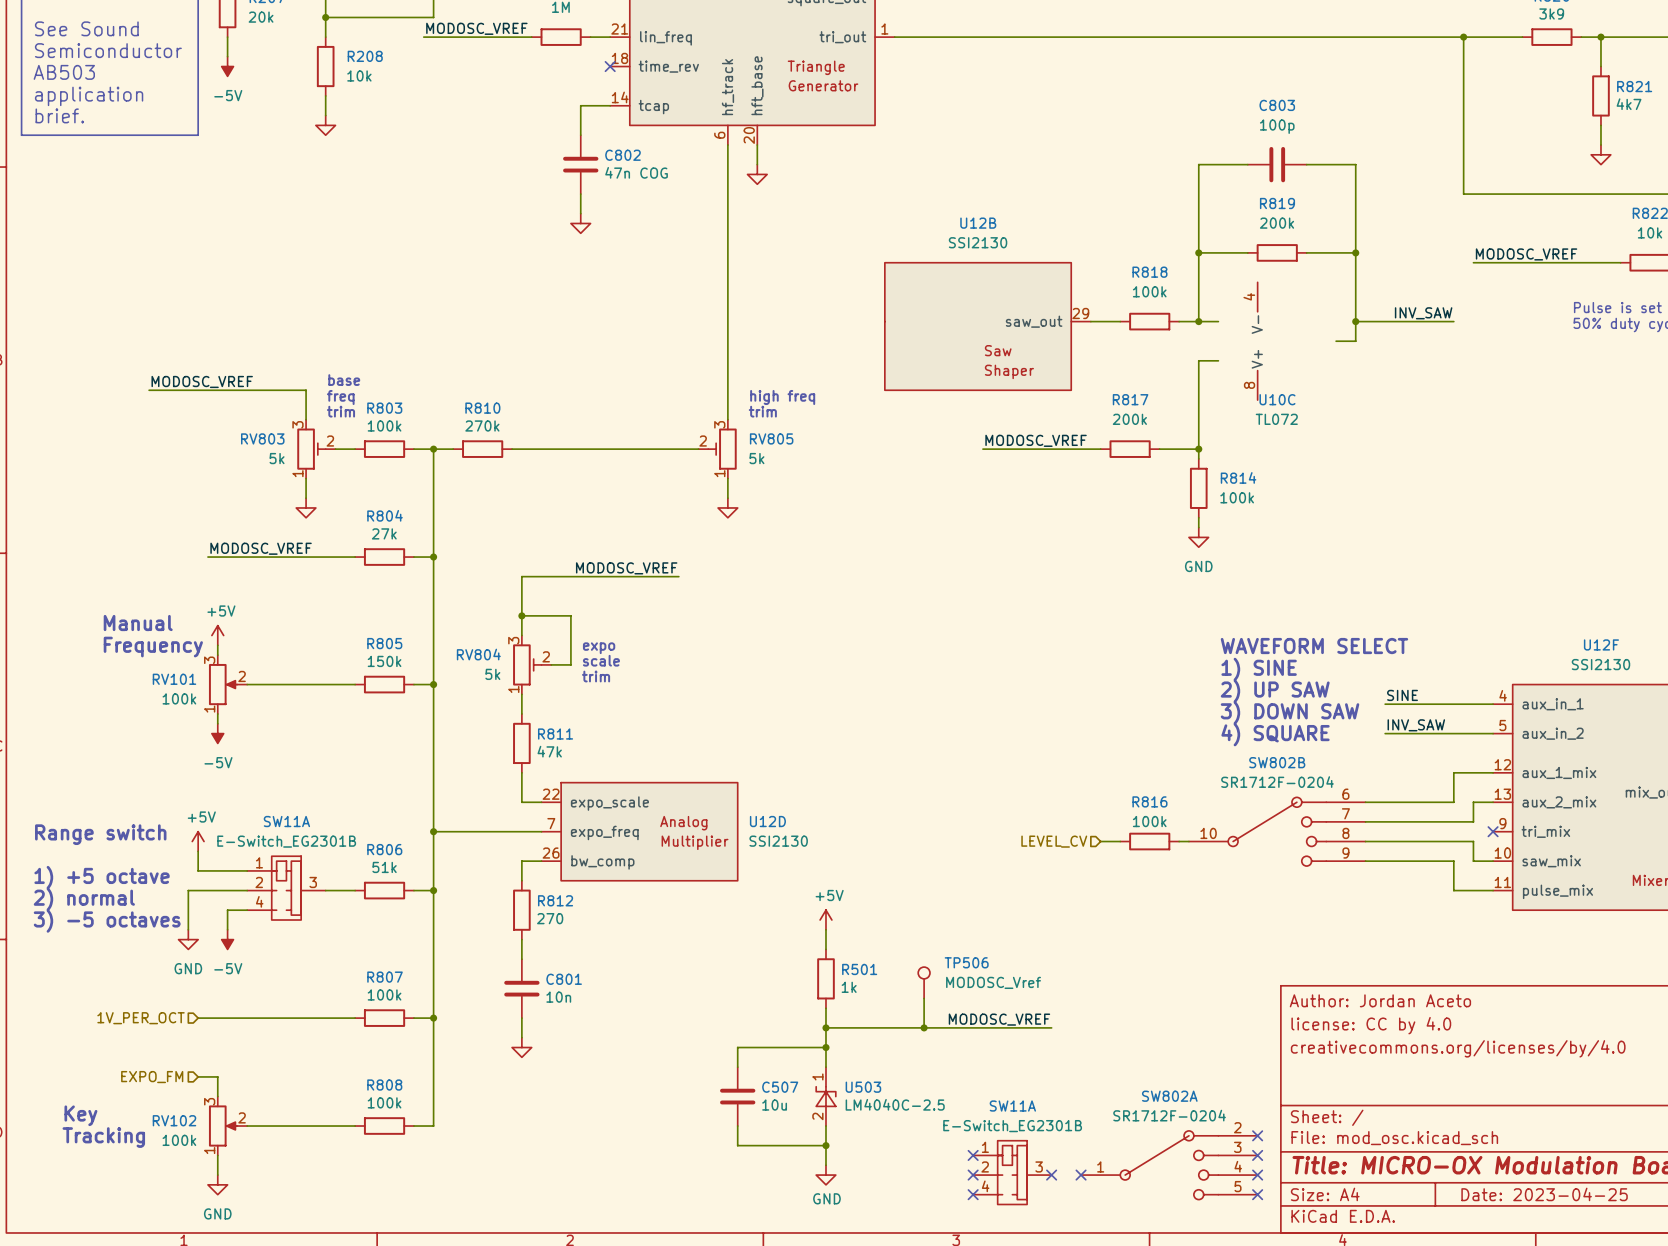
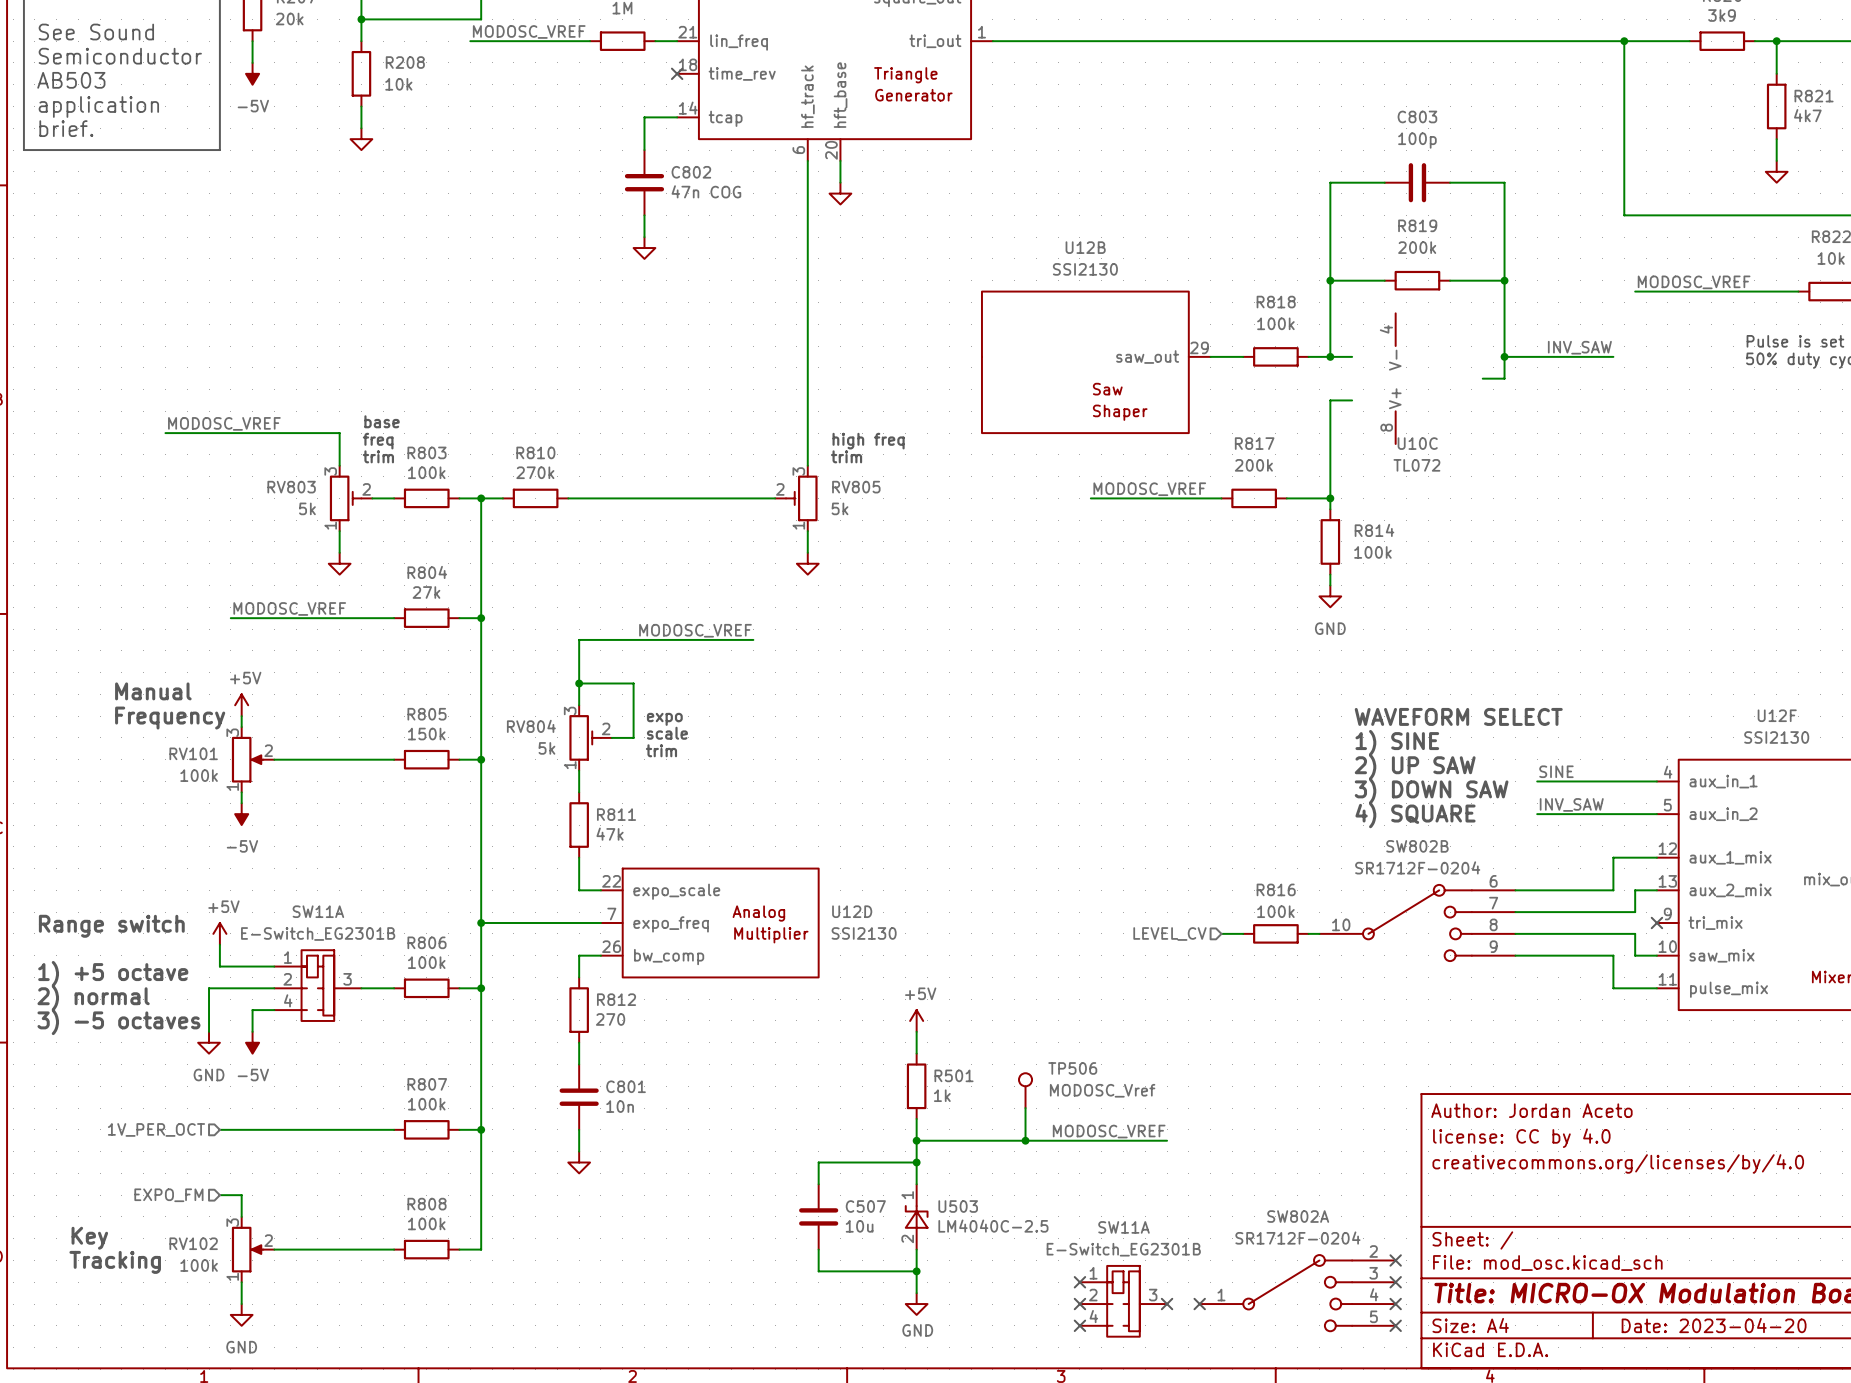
R806 value: 51k (384, 867) -> 100k (426, 962)
title block: Date: 2023-04-25 (1544, 1194) -> Date: 2023-04-20 (1714, 1325)

